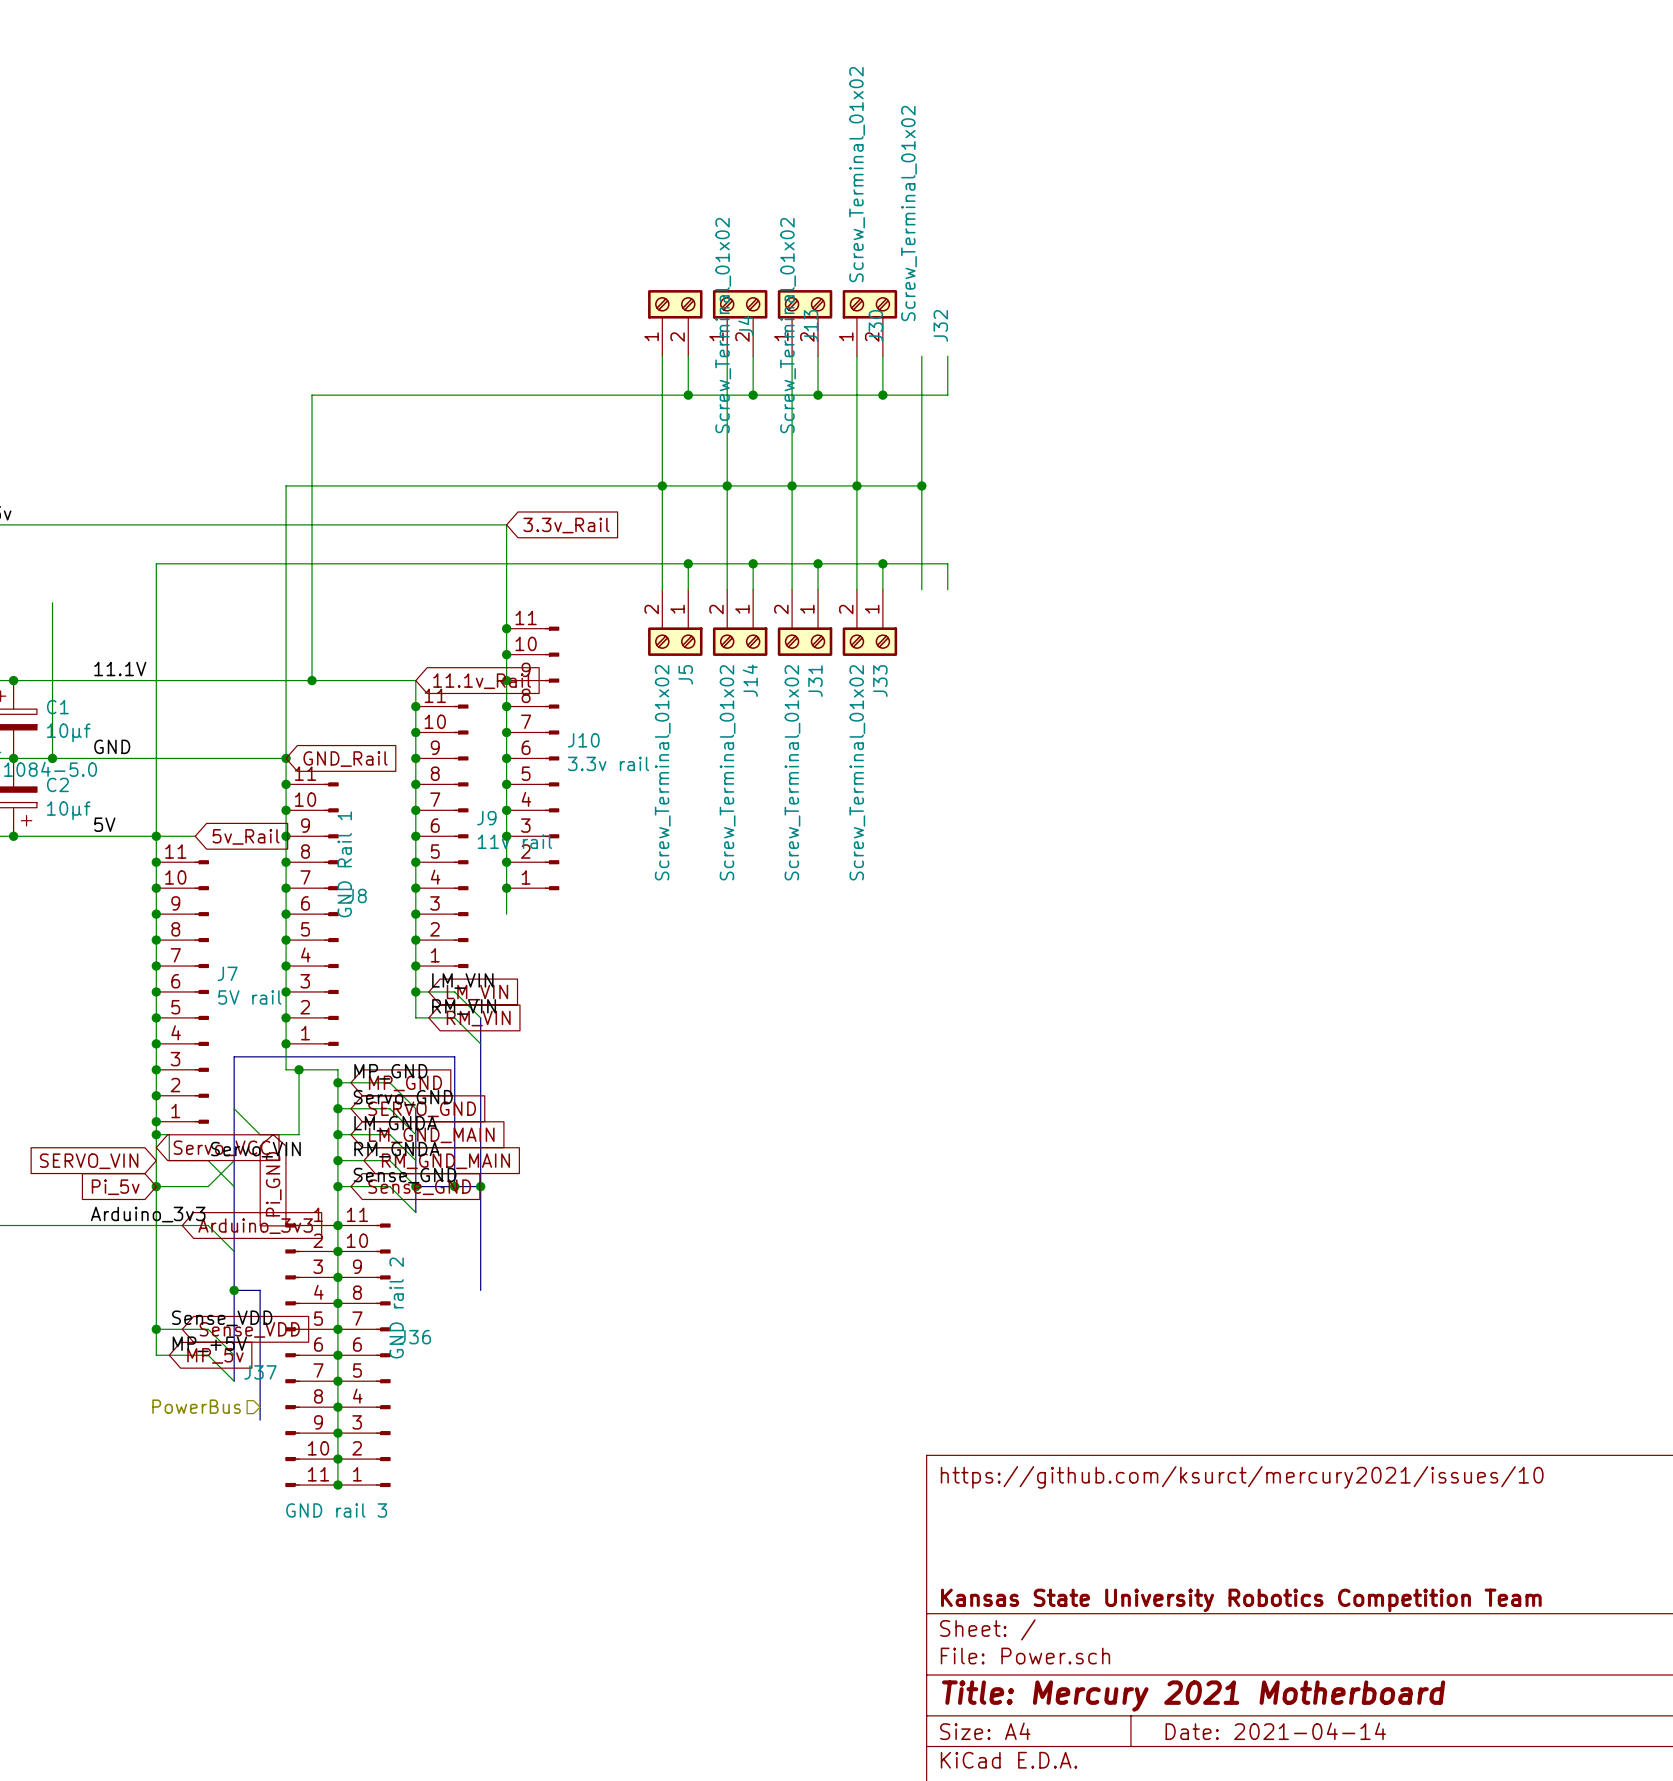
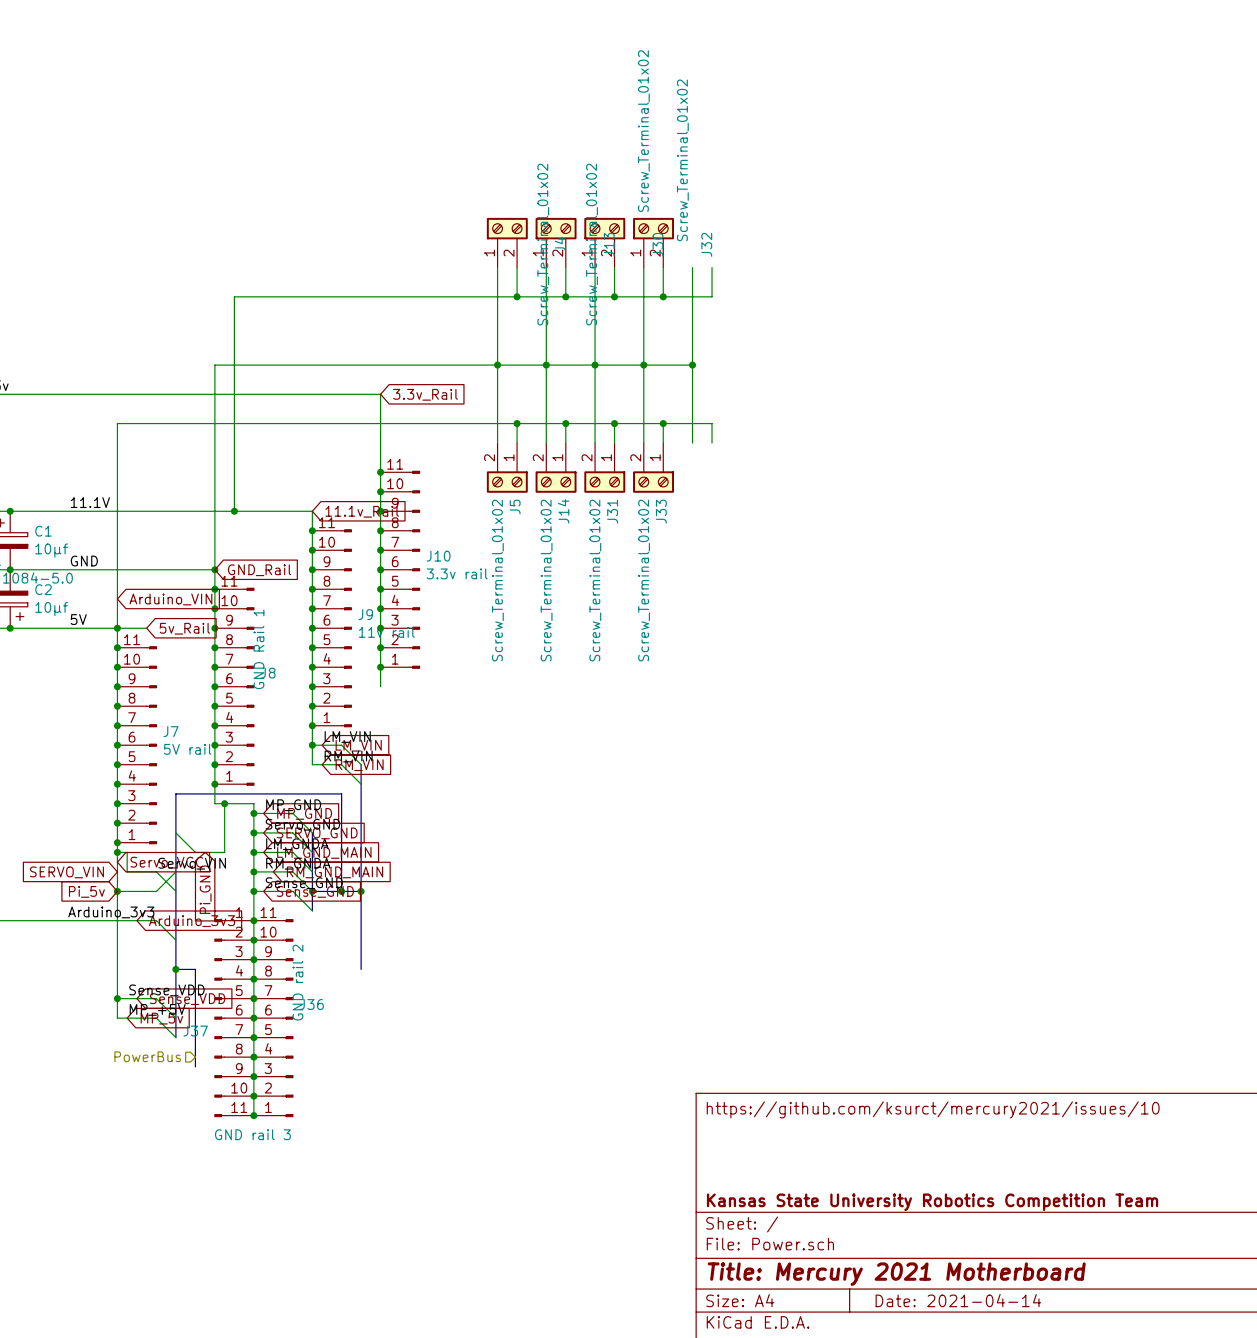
wire: (52, 602) (52, 758) -> none
junction: (52, 758) -> none
global label: none -> Arduino_VIN (170, 599)

